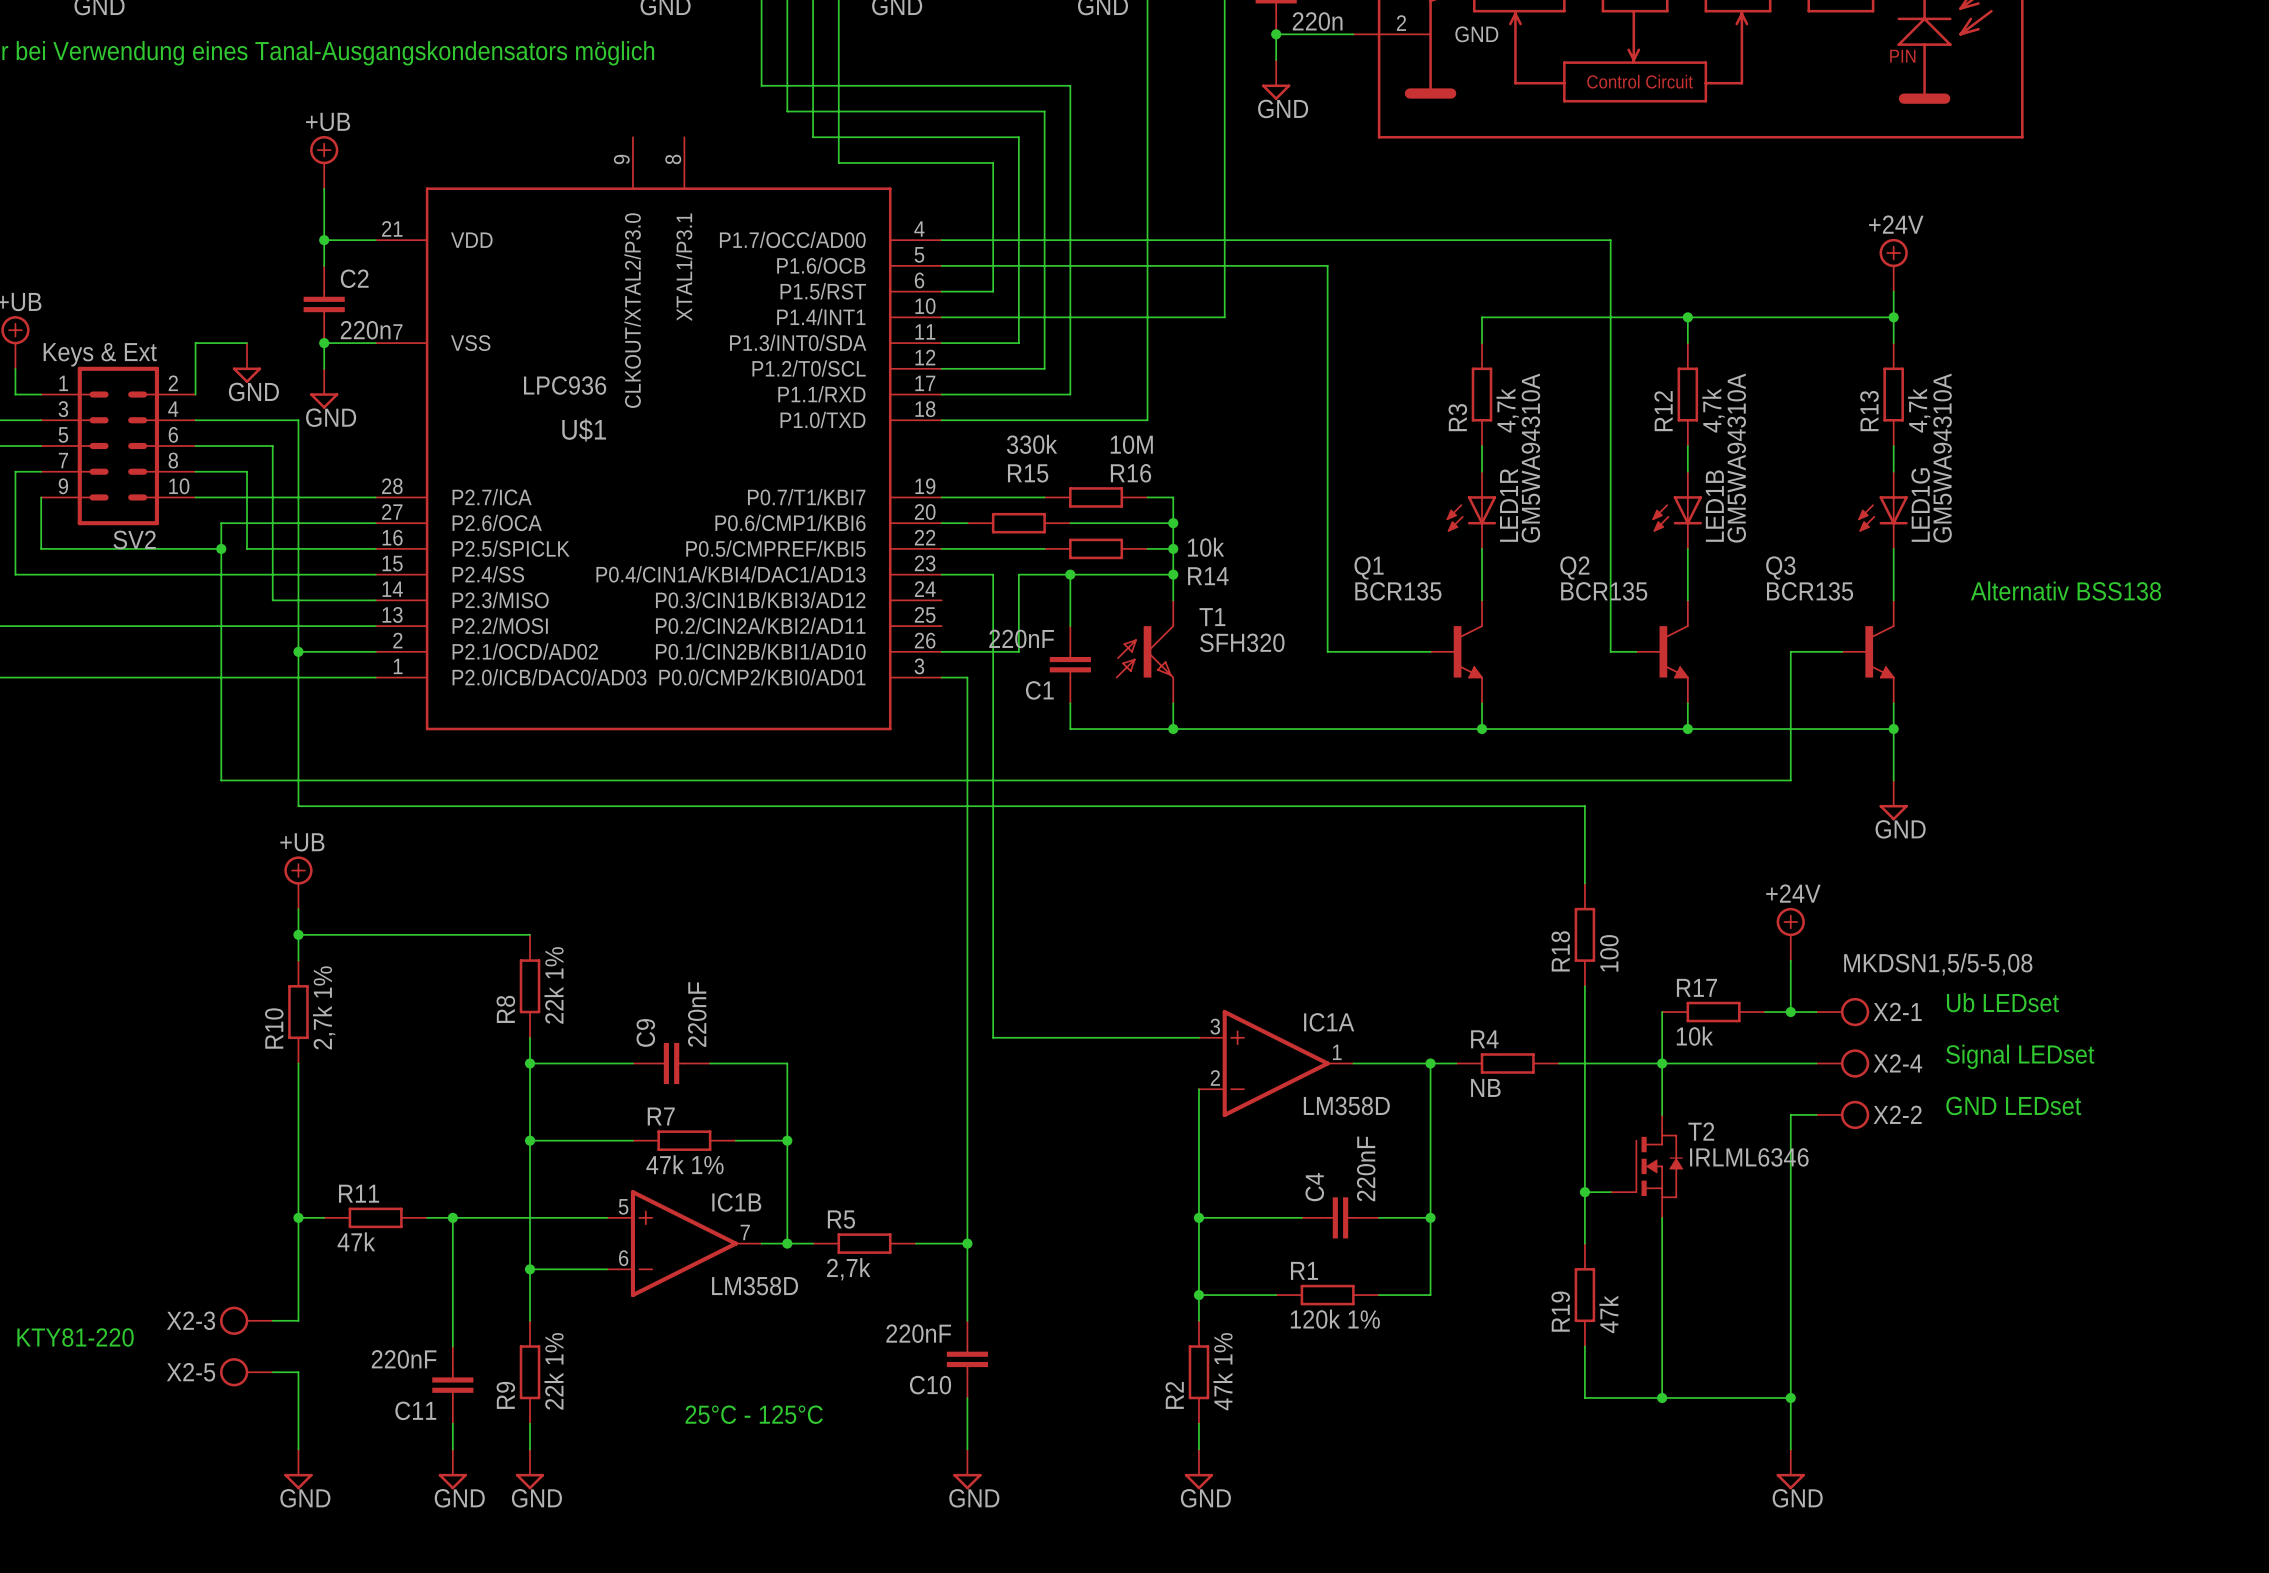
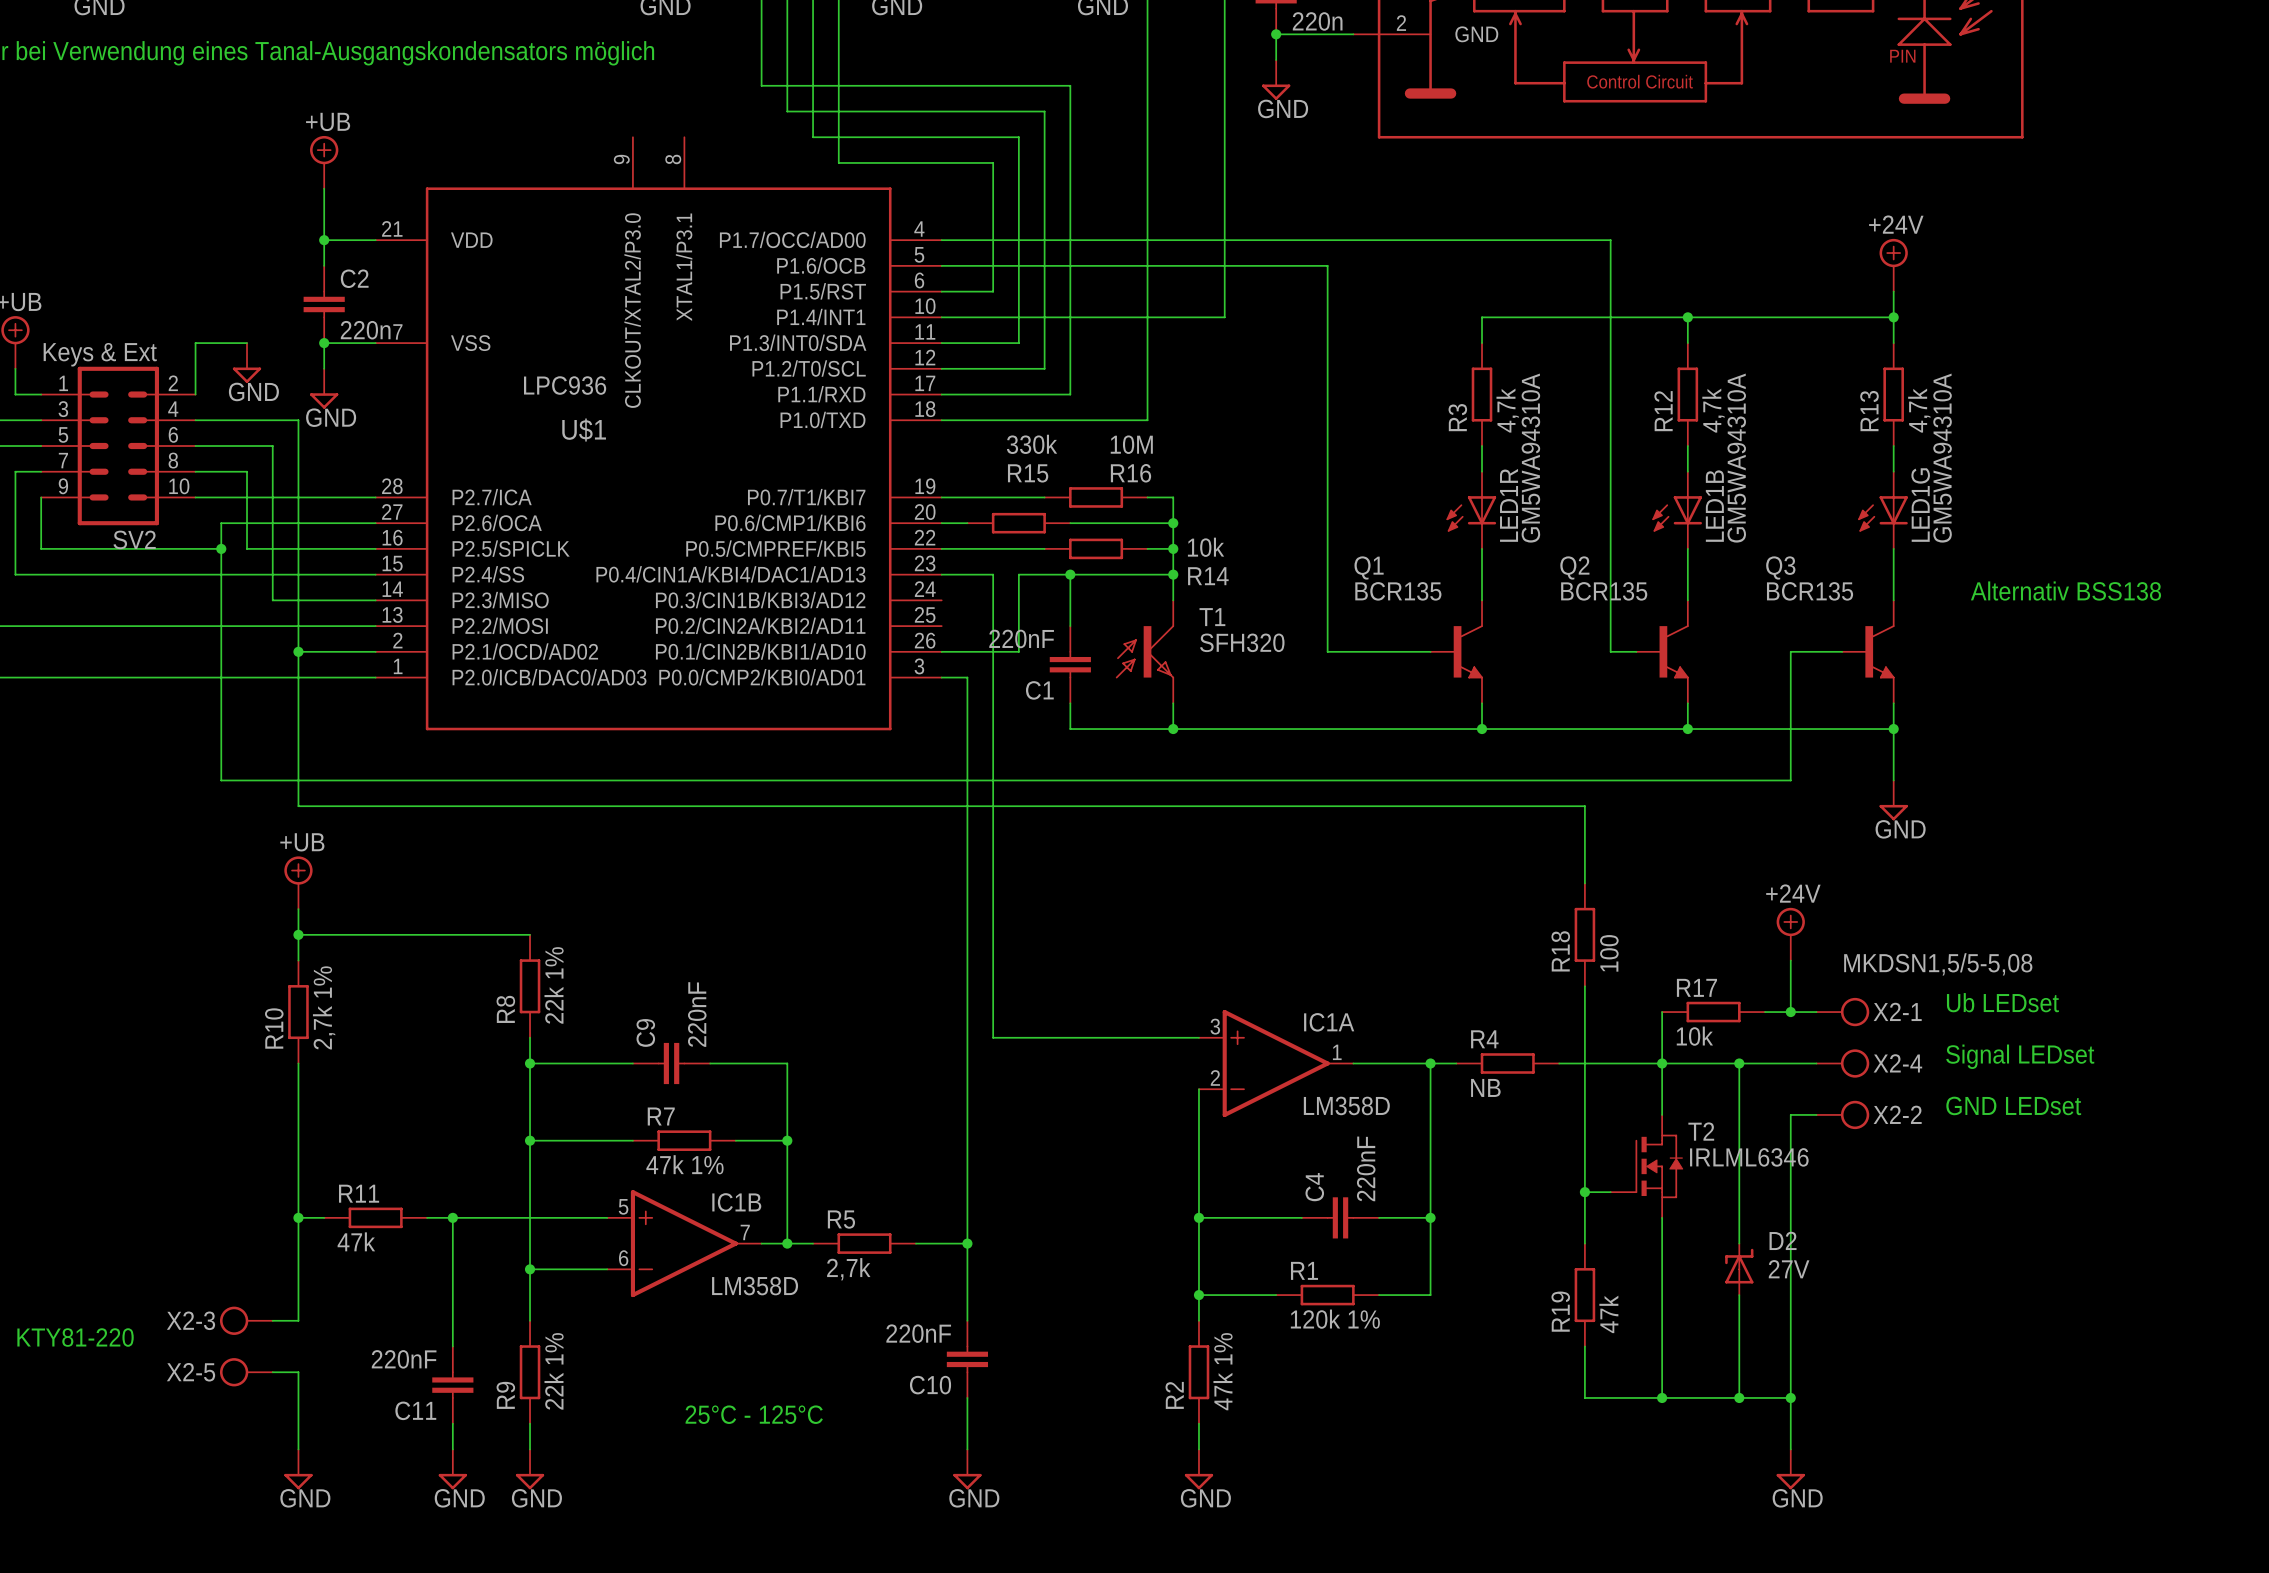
wire: none -> (1739, 1063) (1739, 1243)
junction: none -> (1739, 1063)
D2: none -> 27V (1739, 1269)
wire: none -> (1739, 1295) (1739, 1397)
junction: none -> (1739, 1397)

